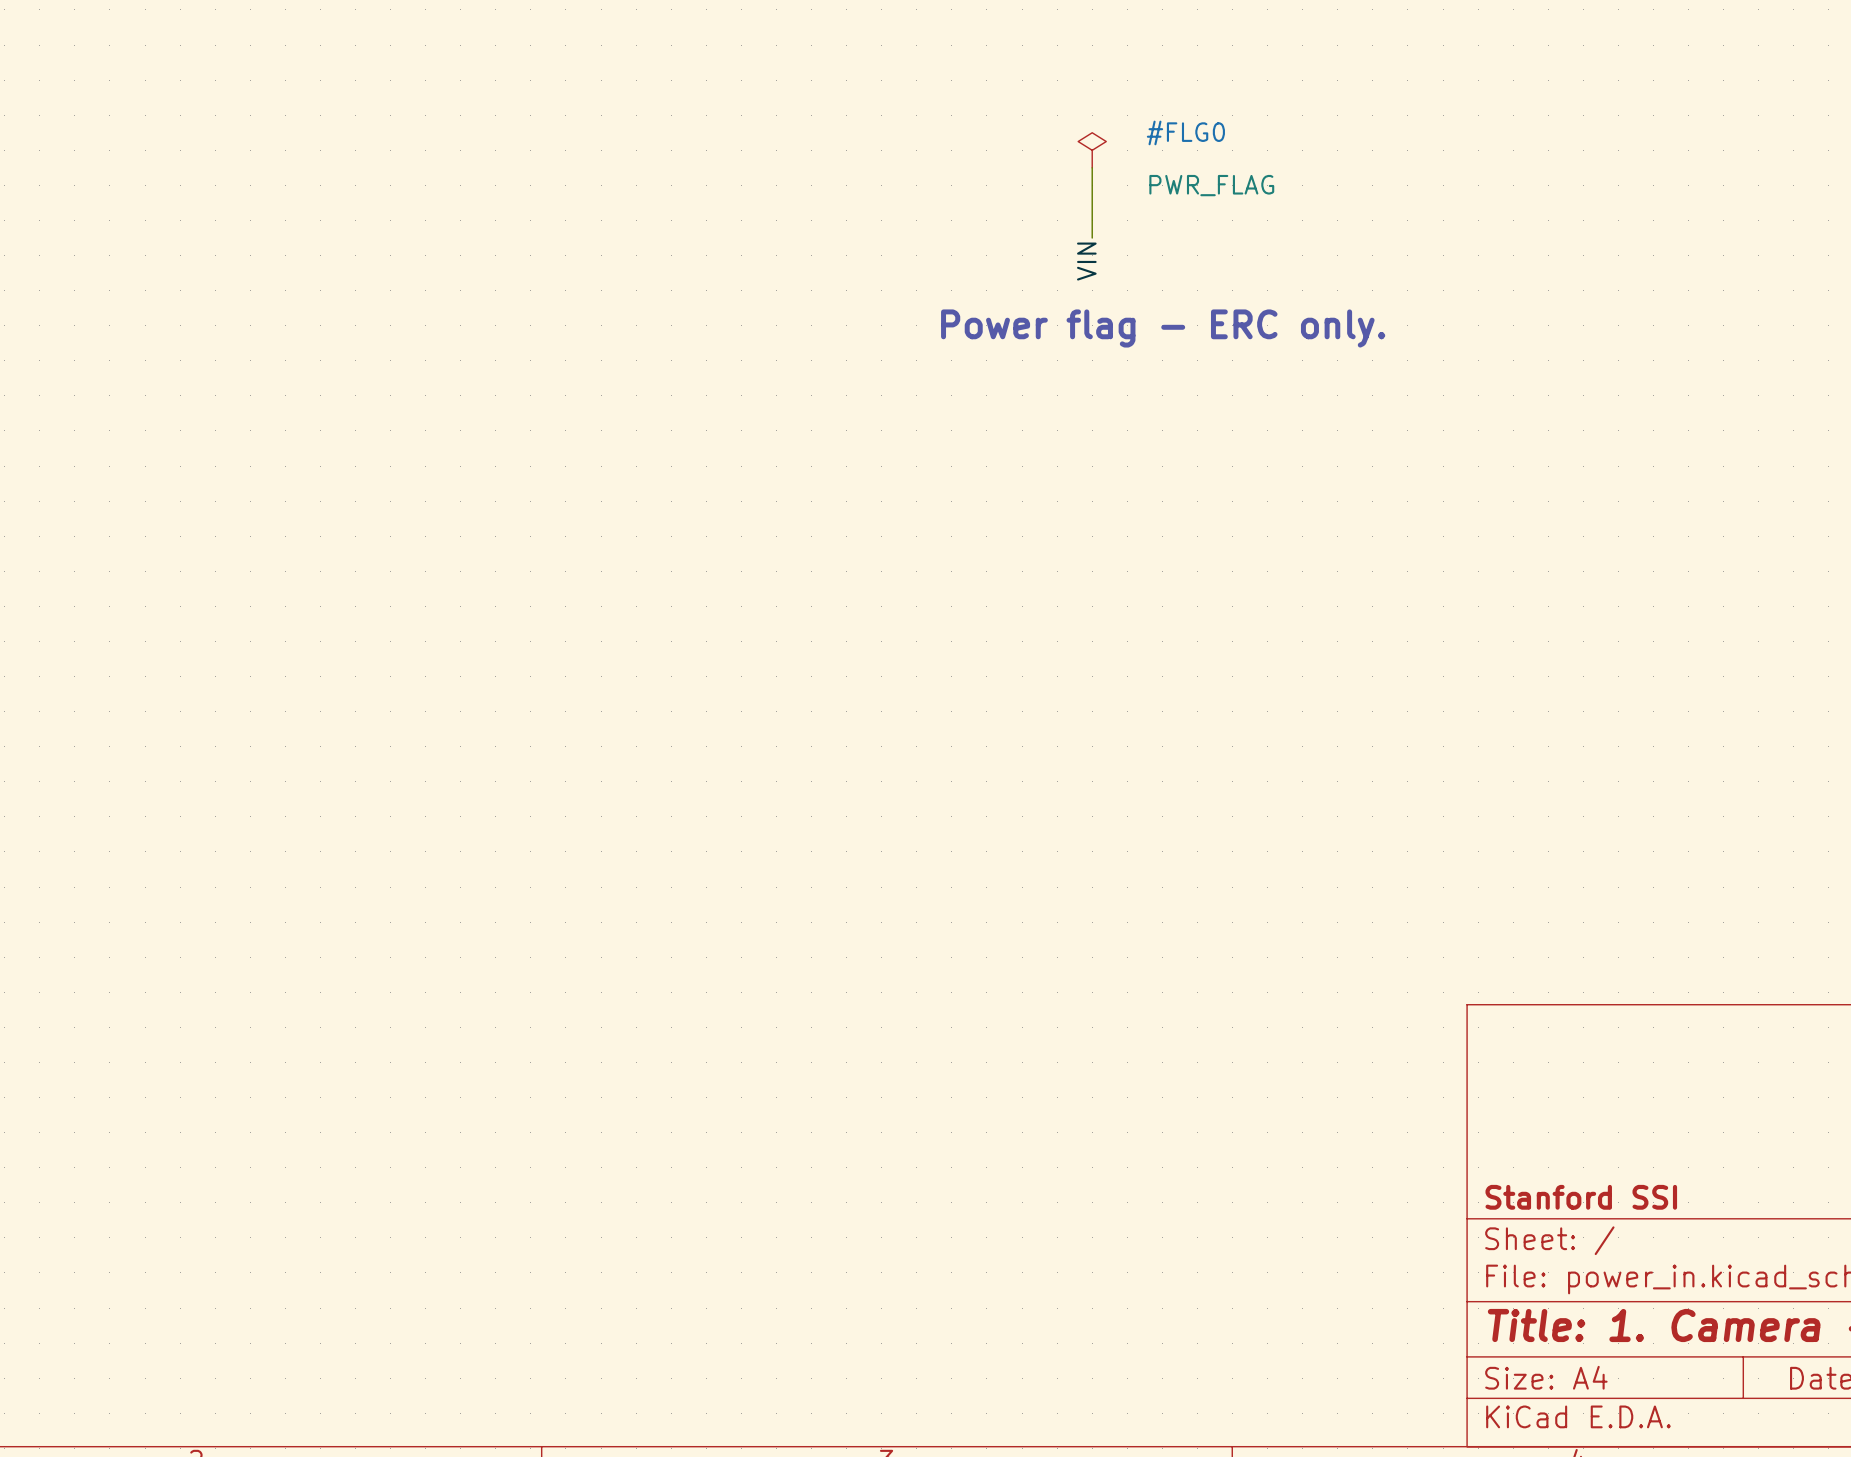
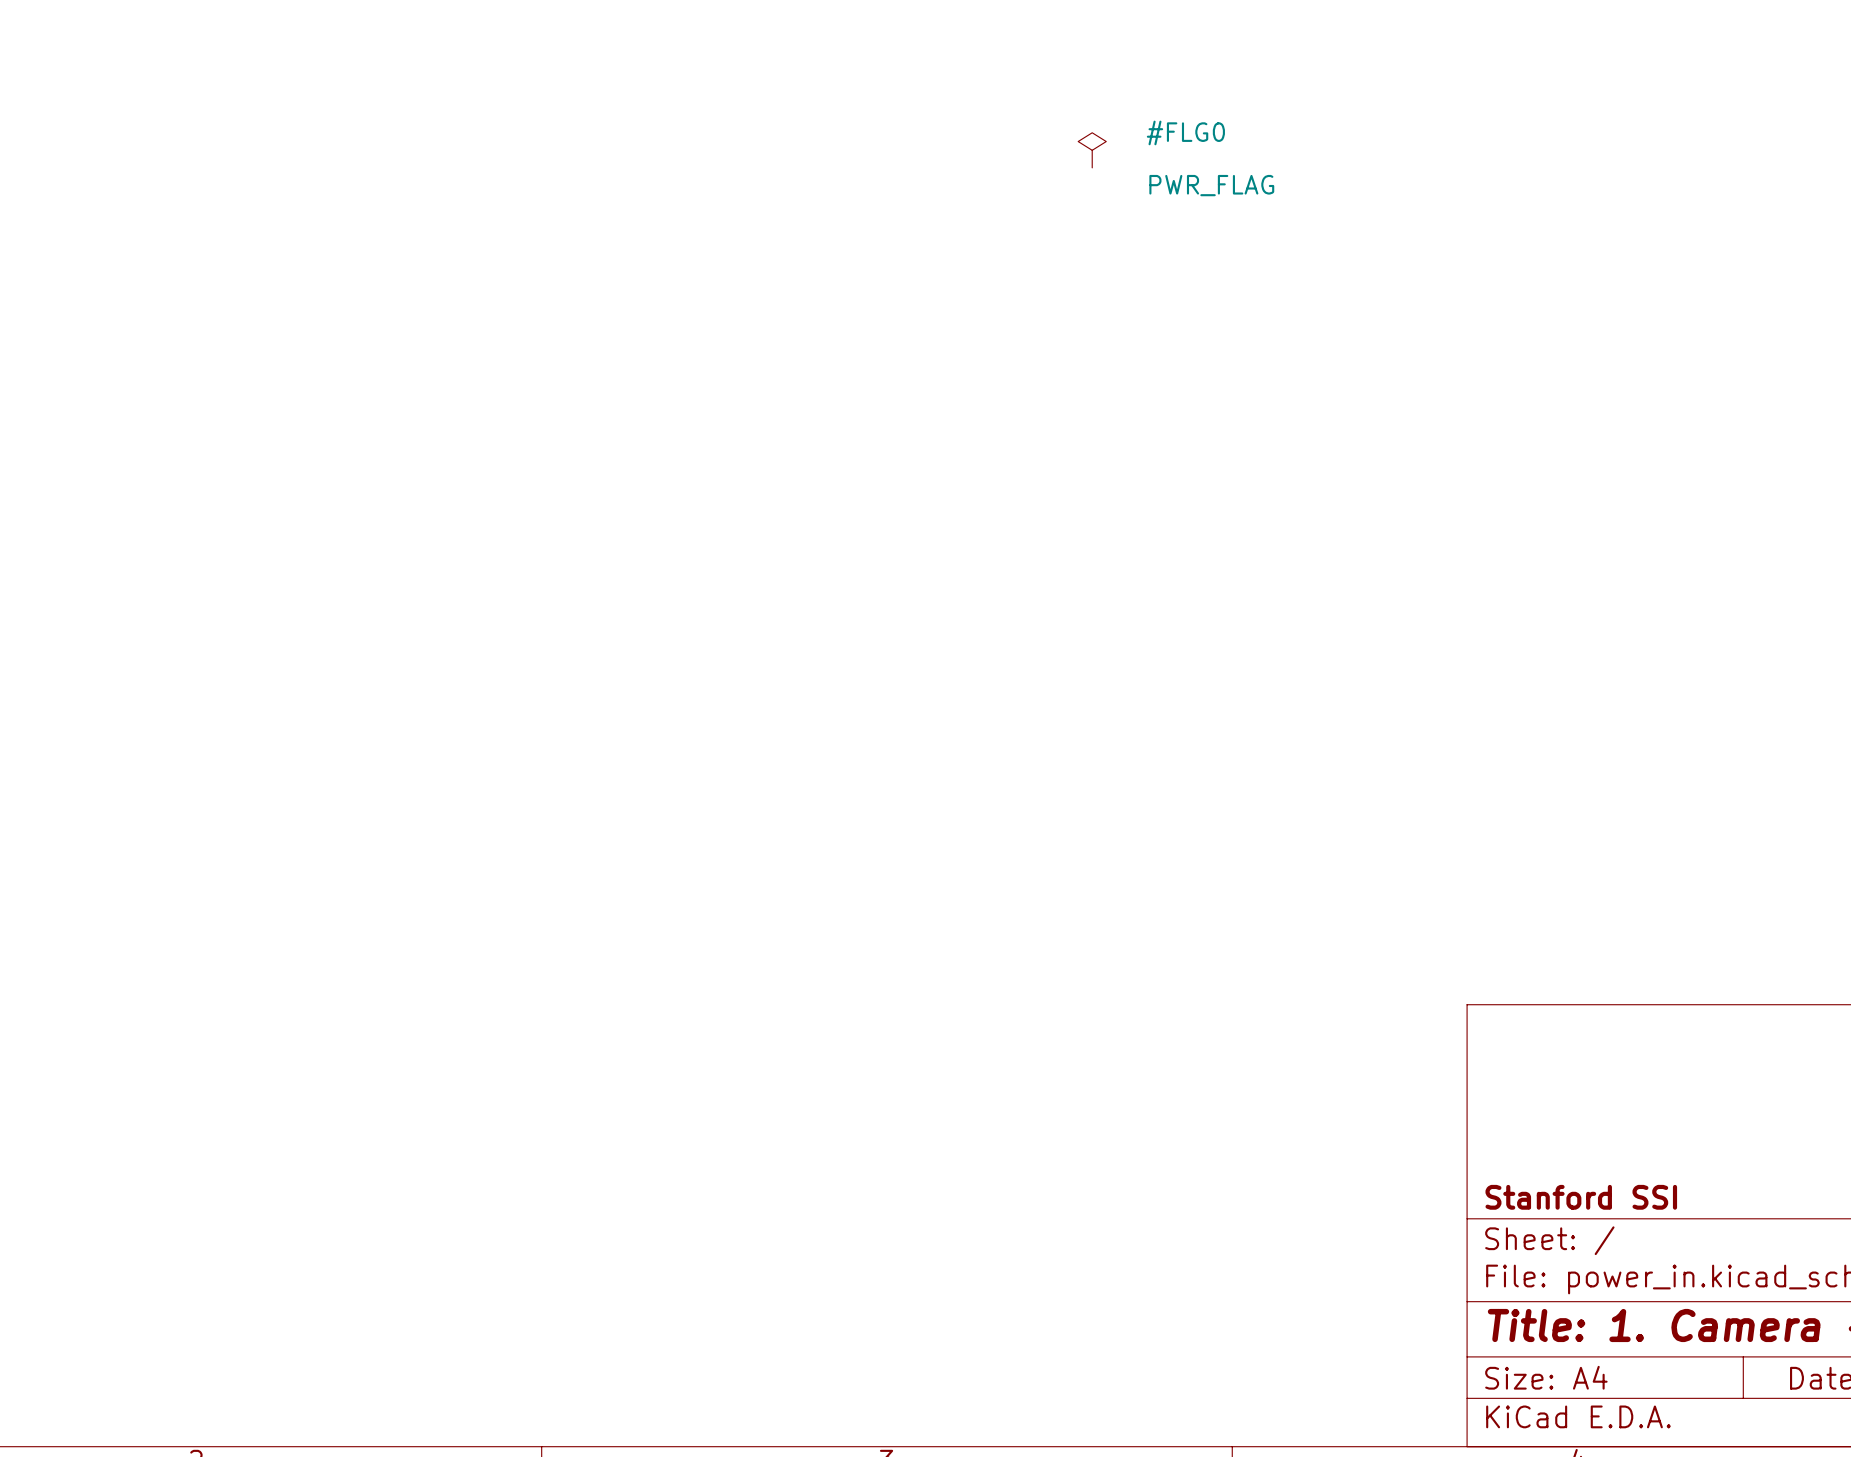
wire: (1092, 167) (1092, 238) -> none
label: VIN (1086, 261) -> none
text: Power flag - ERC only. (1163, 328) -> none

